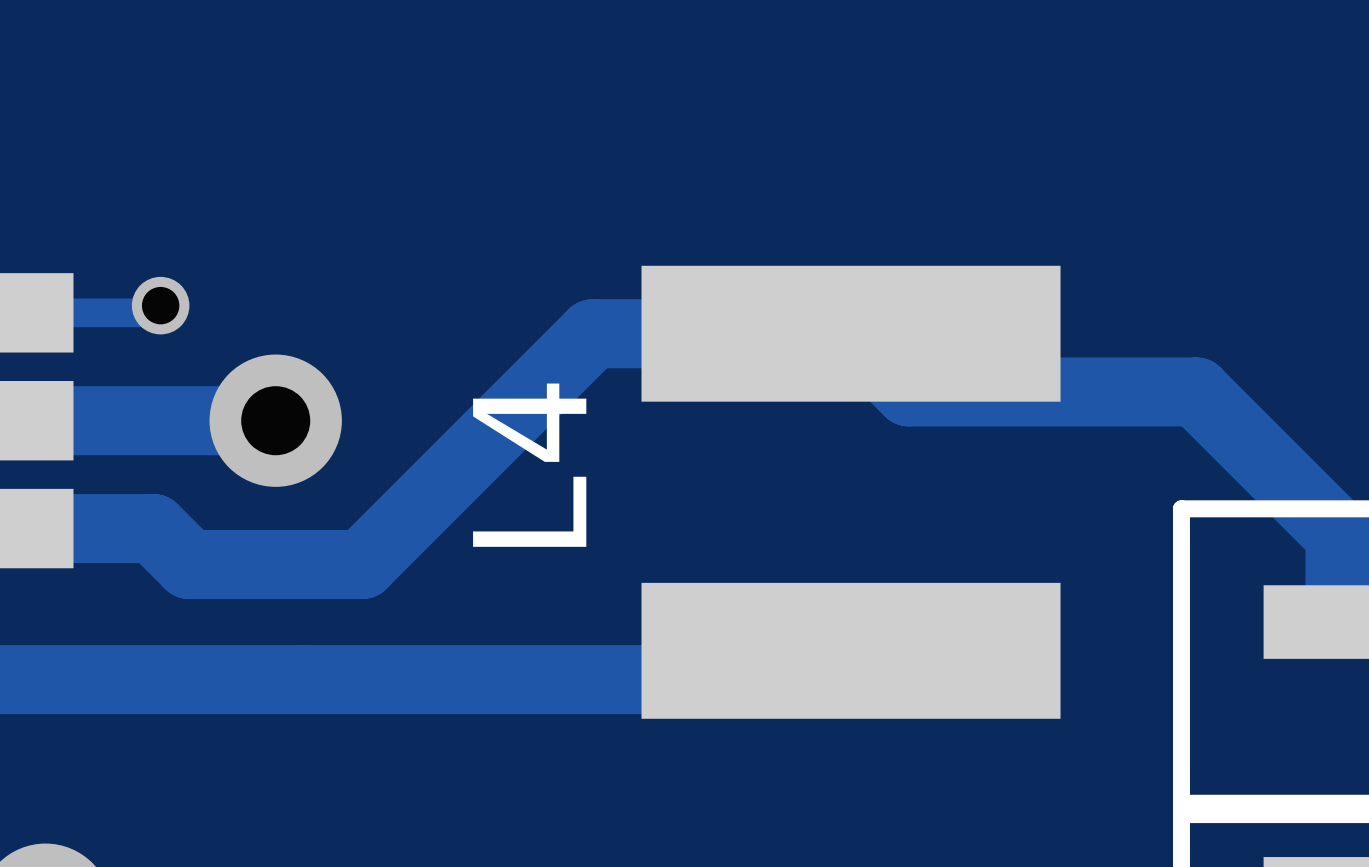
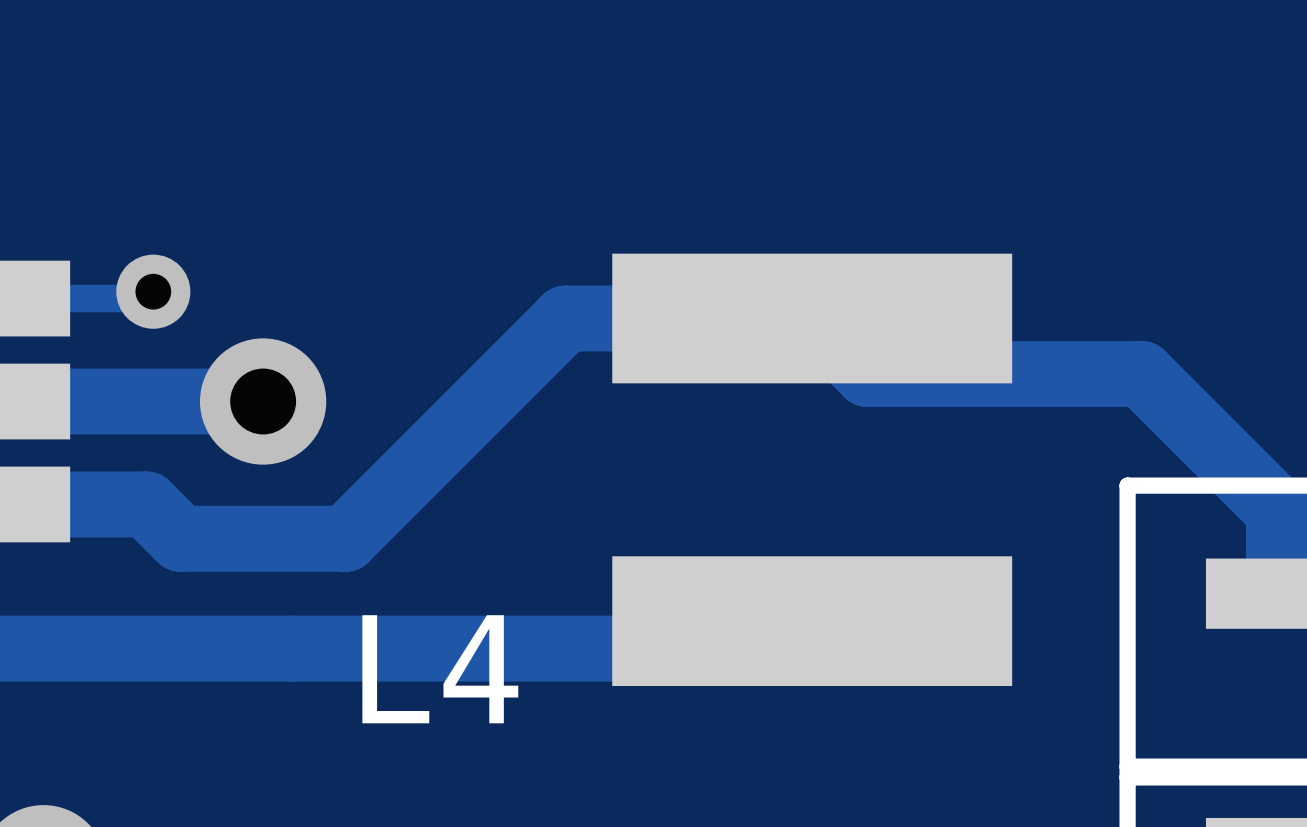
via size: [131, 276, 190, 335] -> [116, 254, 191, 329]
L4 name rotation: 0° (529, 465) -> 90° clockwise (440, 669)

